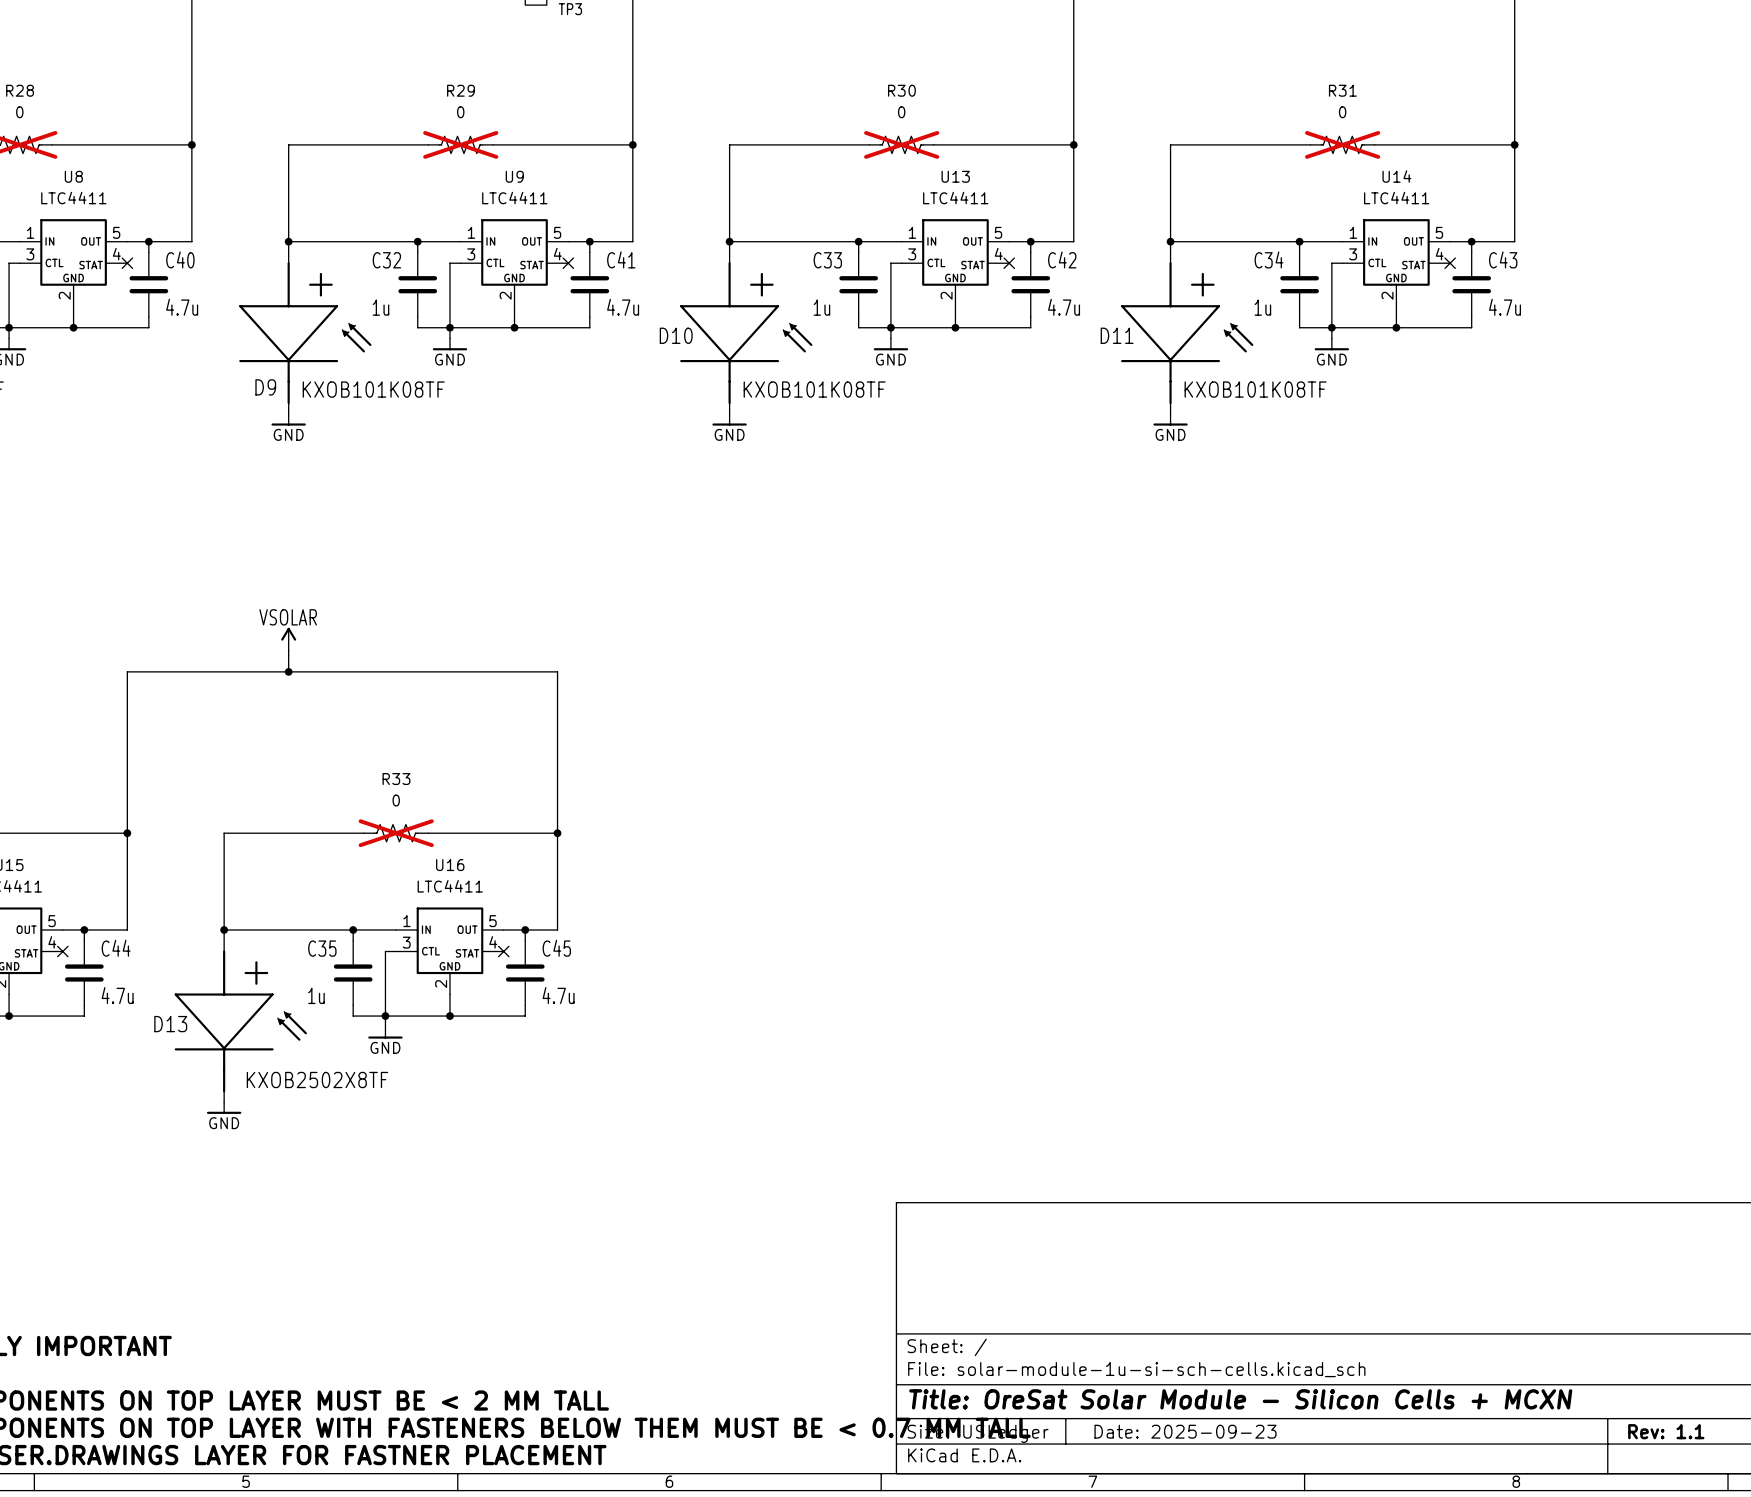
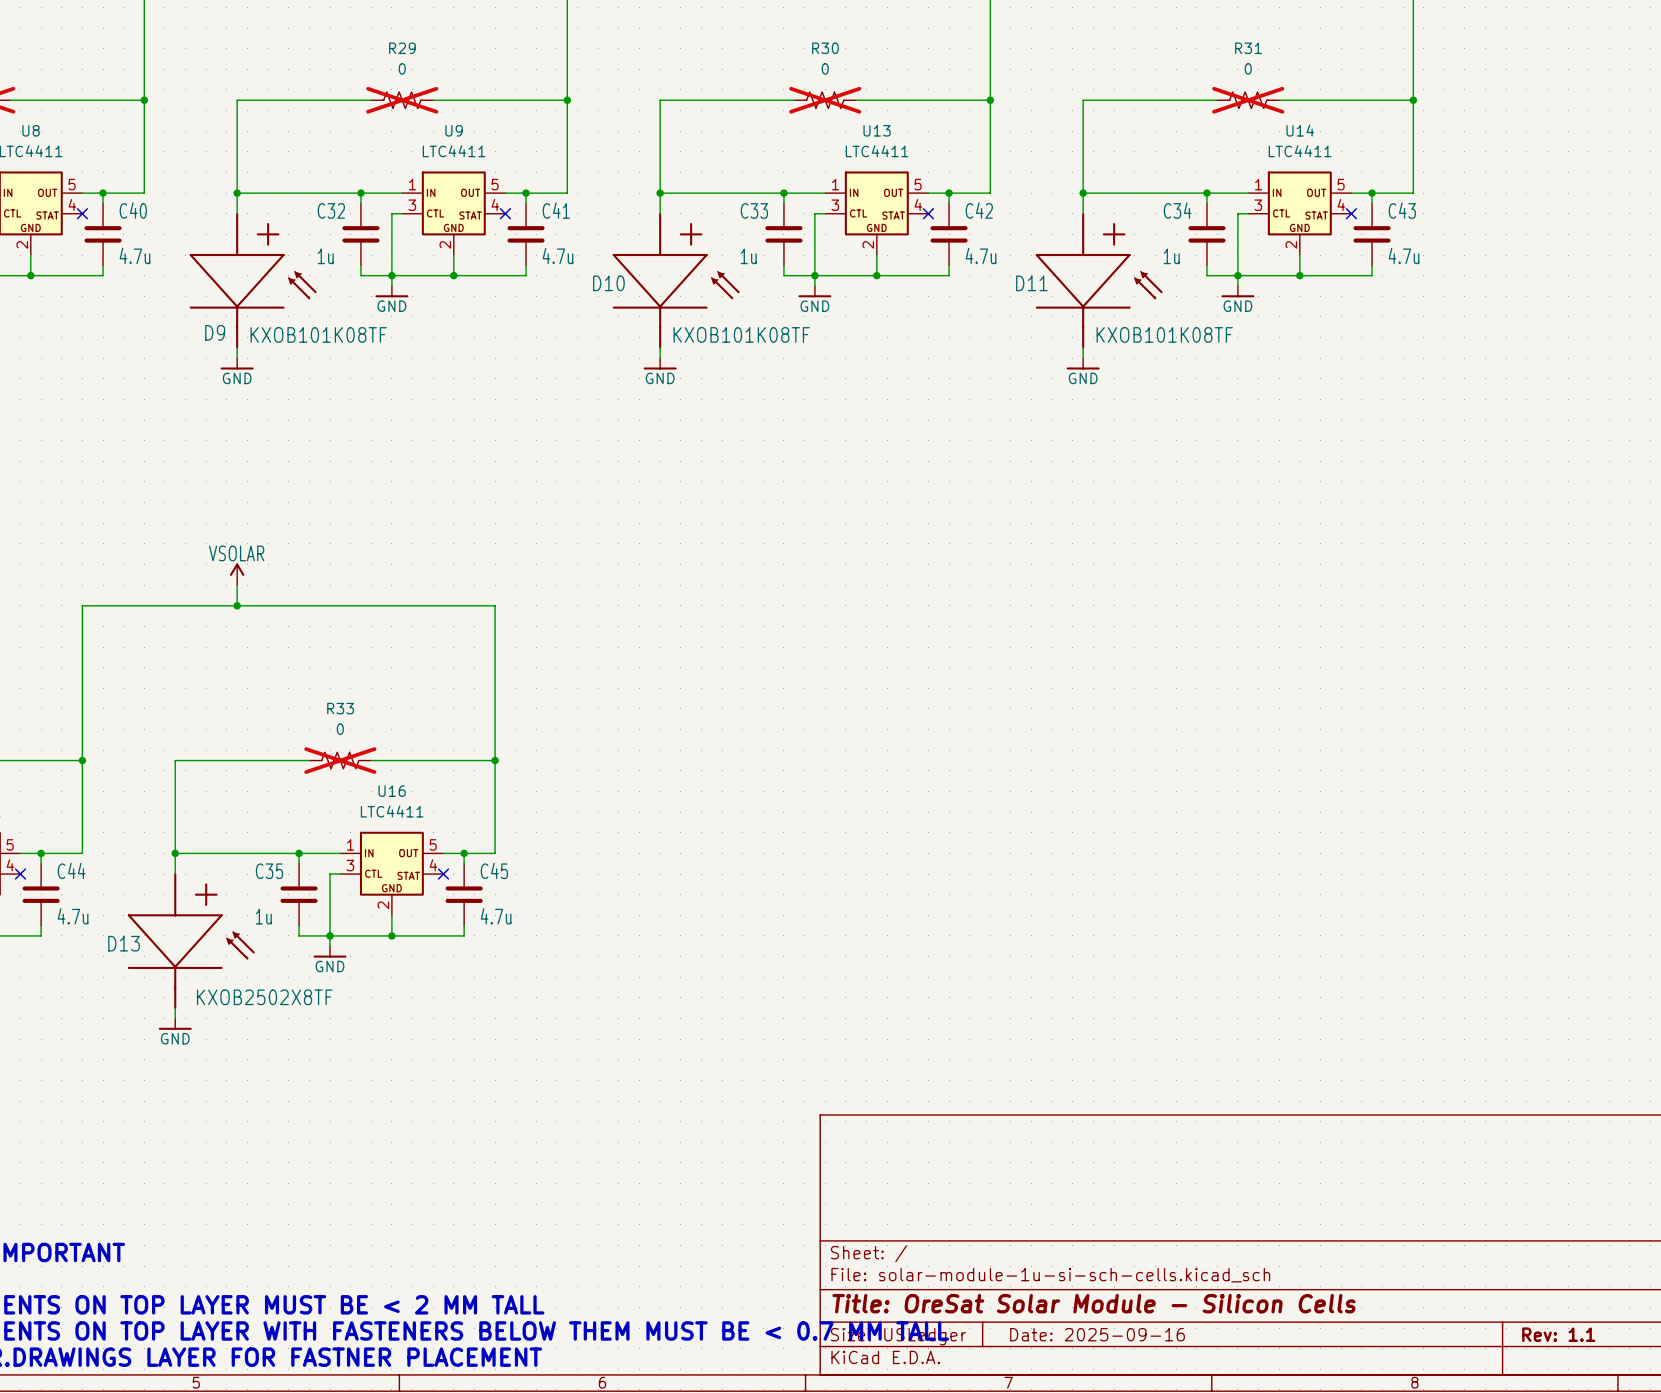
title block: Title: OreSat Solar Module - Silicon Cells + MCXN (1240, 1399) -> Title: OreSat Solar Module - Silicon Cells (1094, 1303)
title block: Date: 2025-09-23 (1185, 1431) -> Date: 2025-09-16 (1097, 1334)

